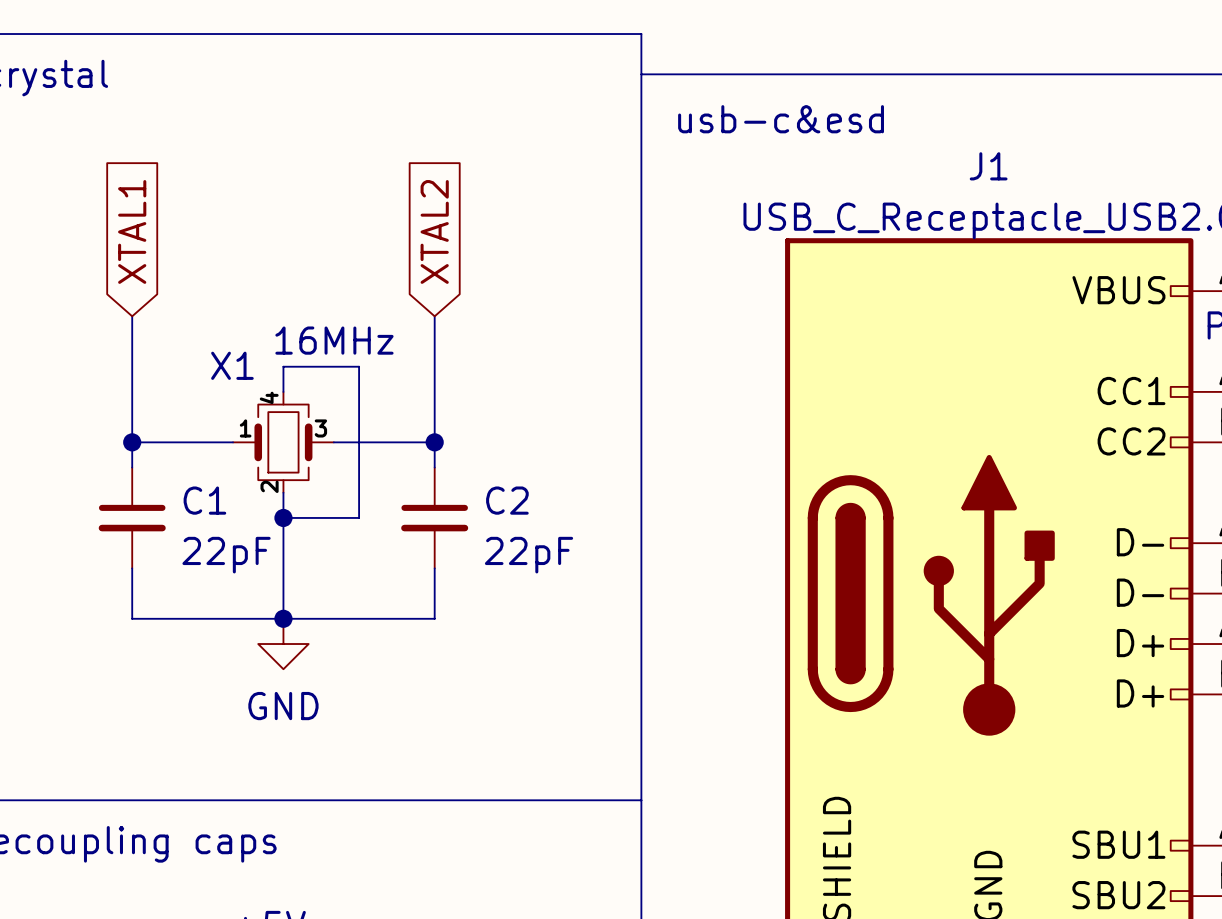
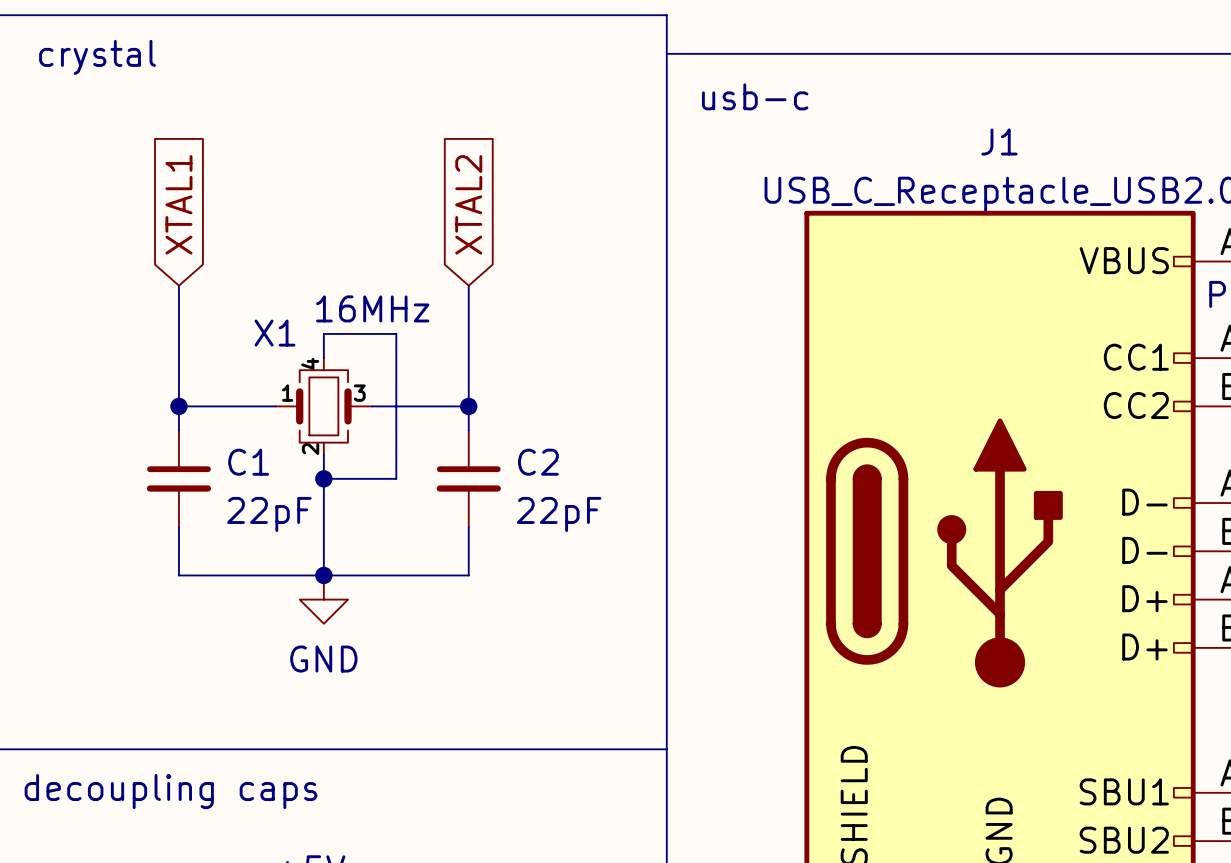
text: usb-c&esd (781, 119) -> usb-c (755, 96)

